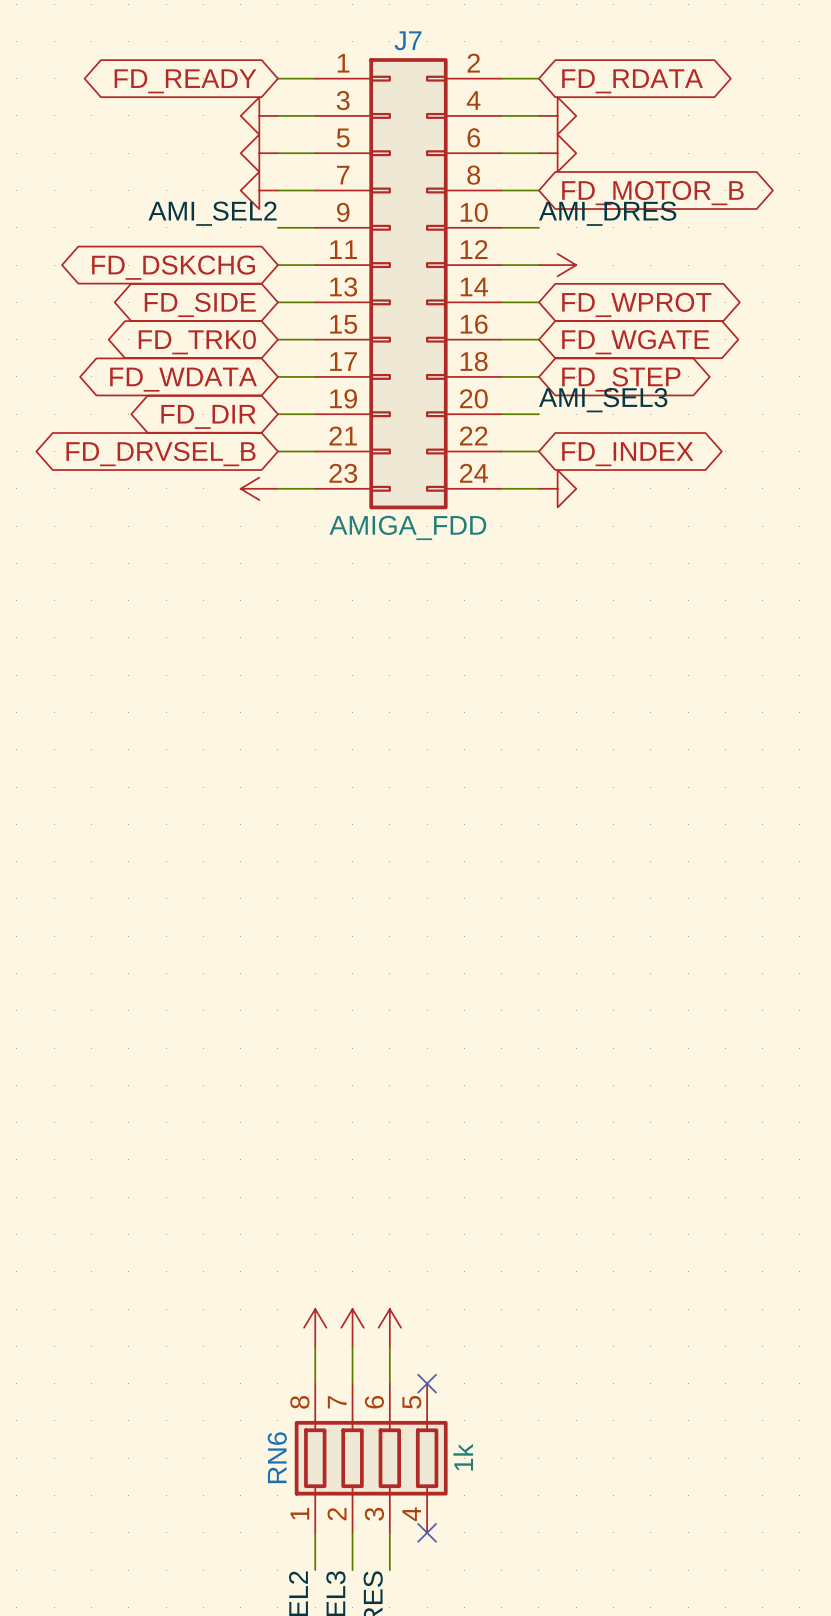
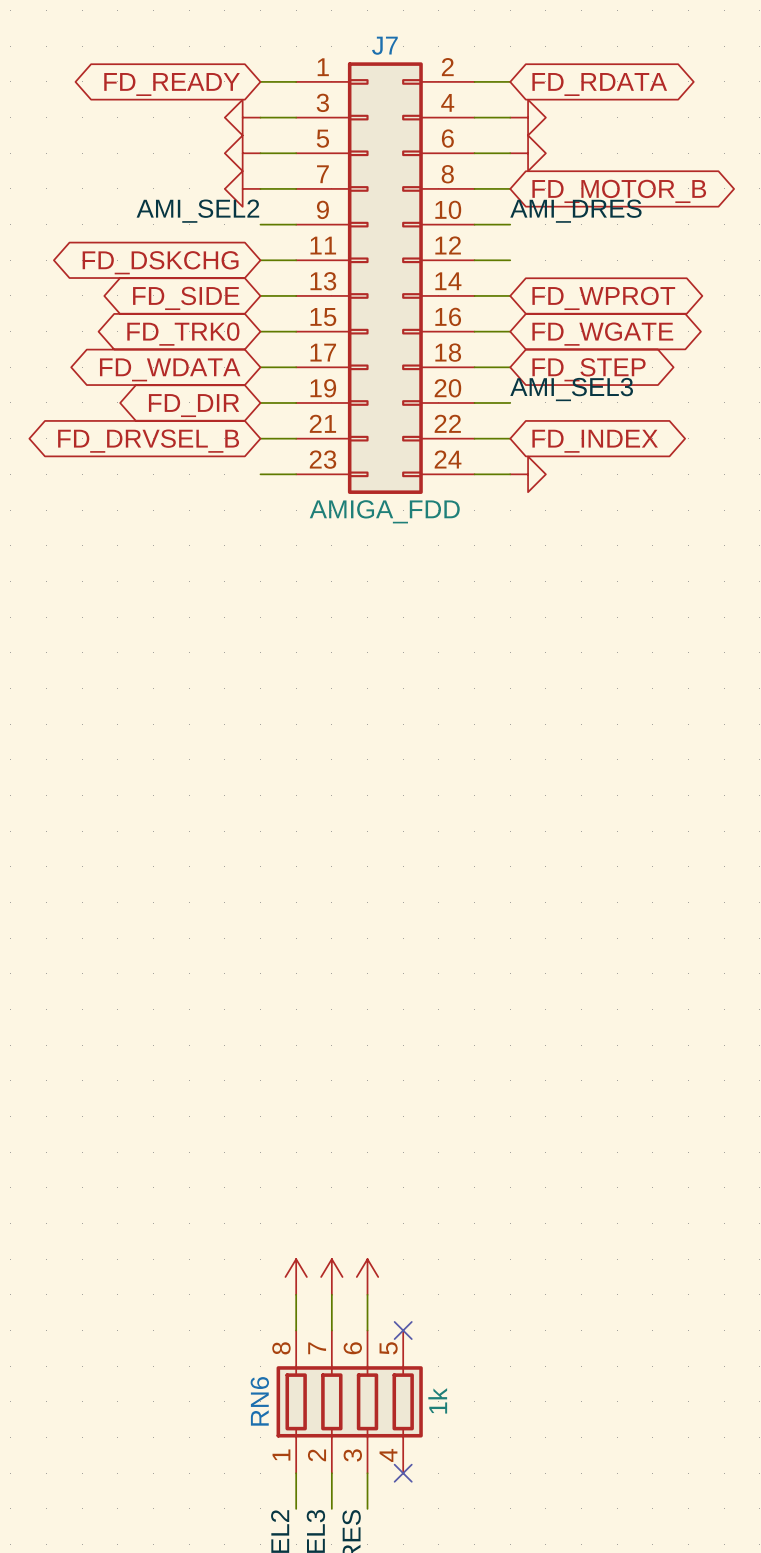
power symbol: (557, 265) -> none
power symbol: (259, 488) -> none

